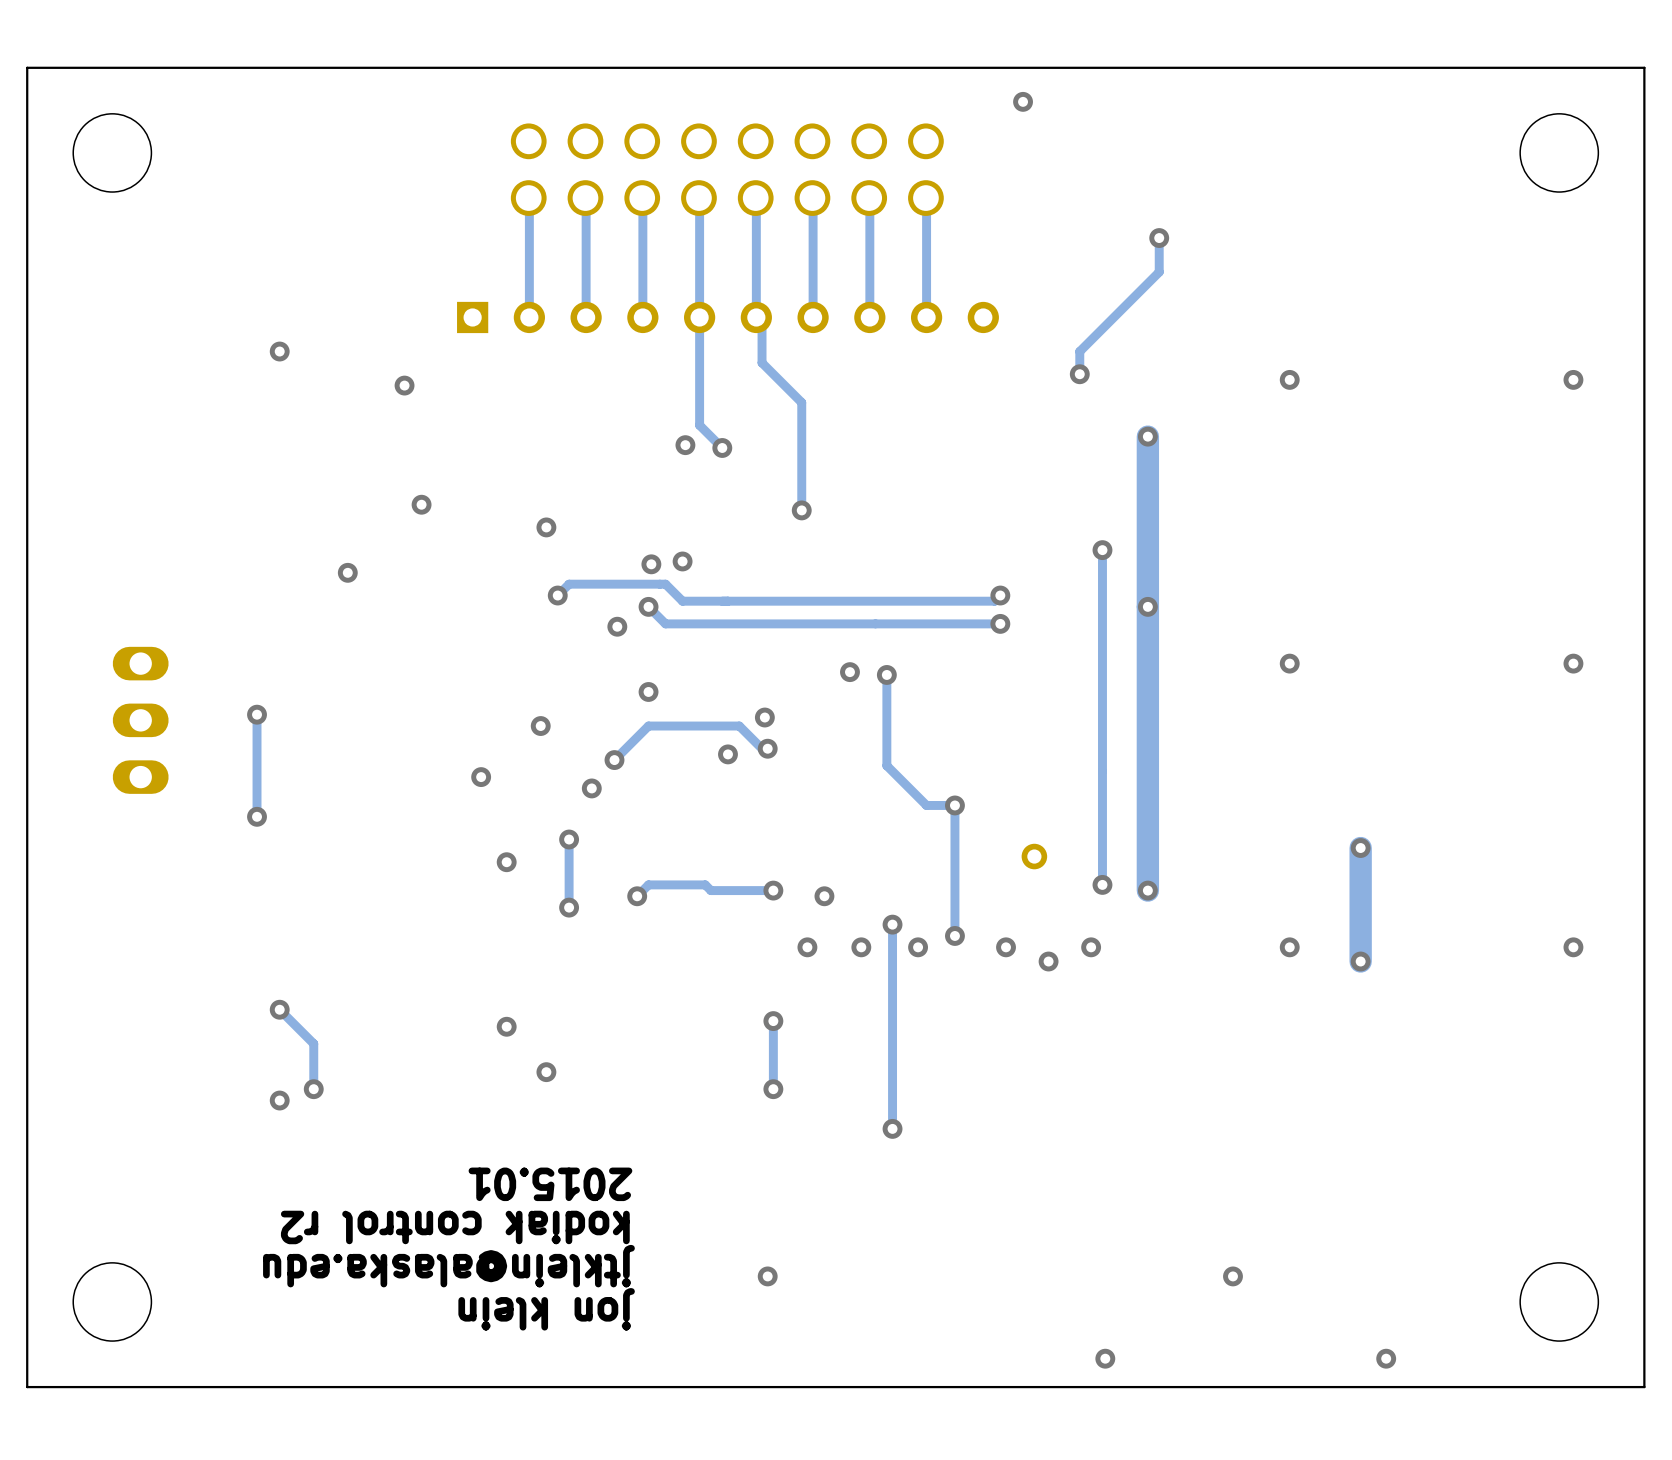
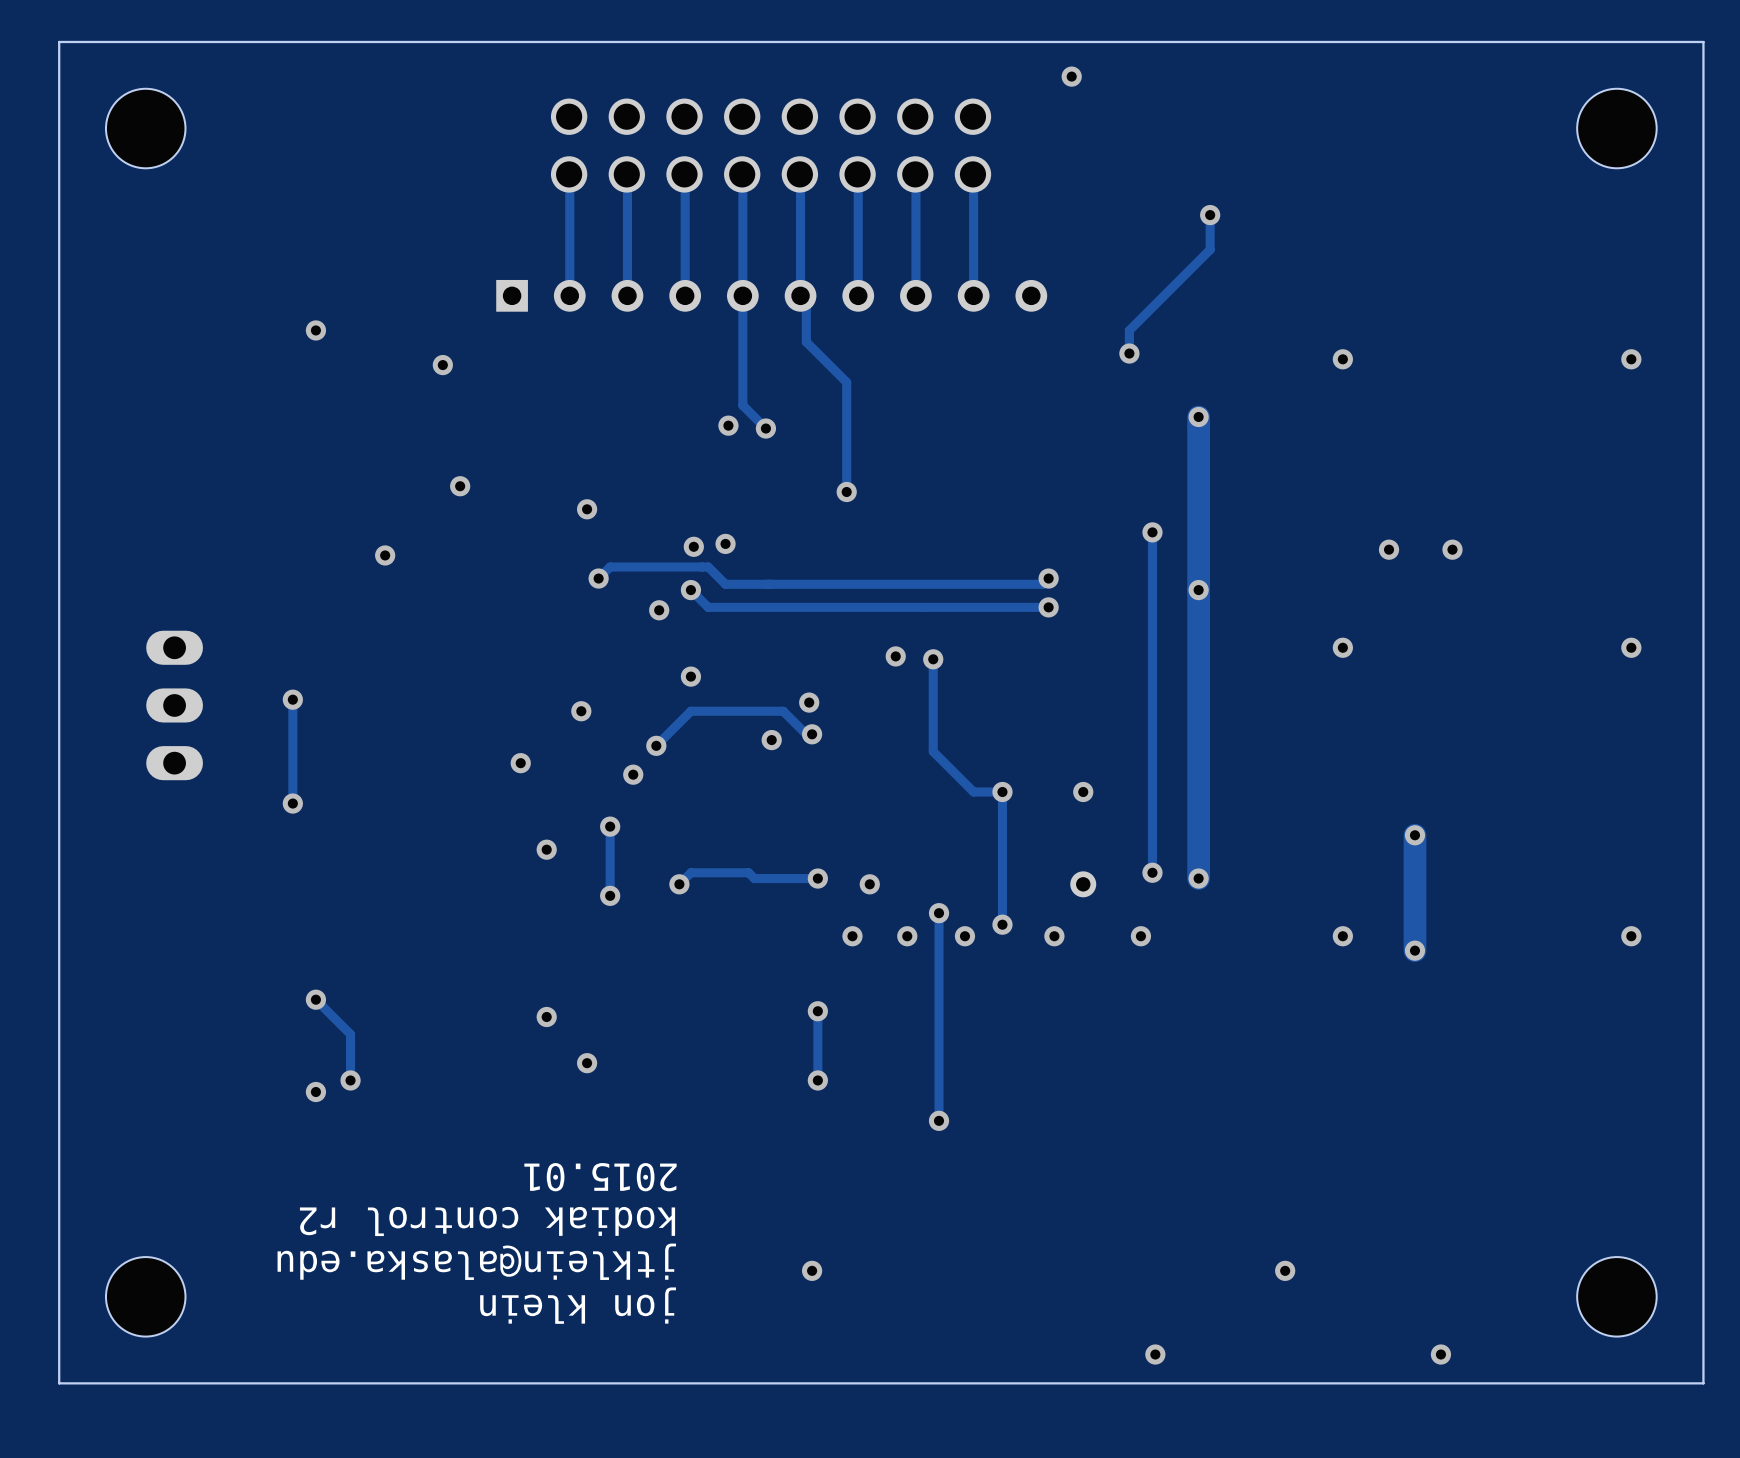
via: none -> (1389, 549)
via: none -> (1452, 549)
via: none -> (1083, 792)
part position: (1034, 856) -> (1083, 884)
via: (1048, 961) -> none

